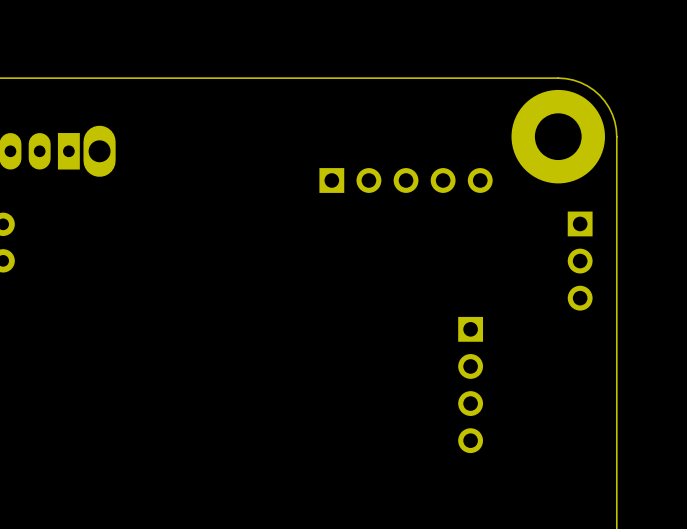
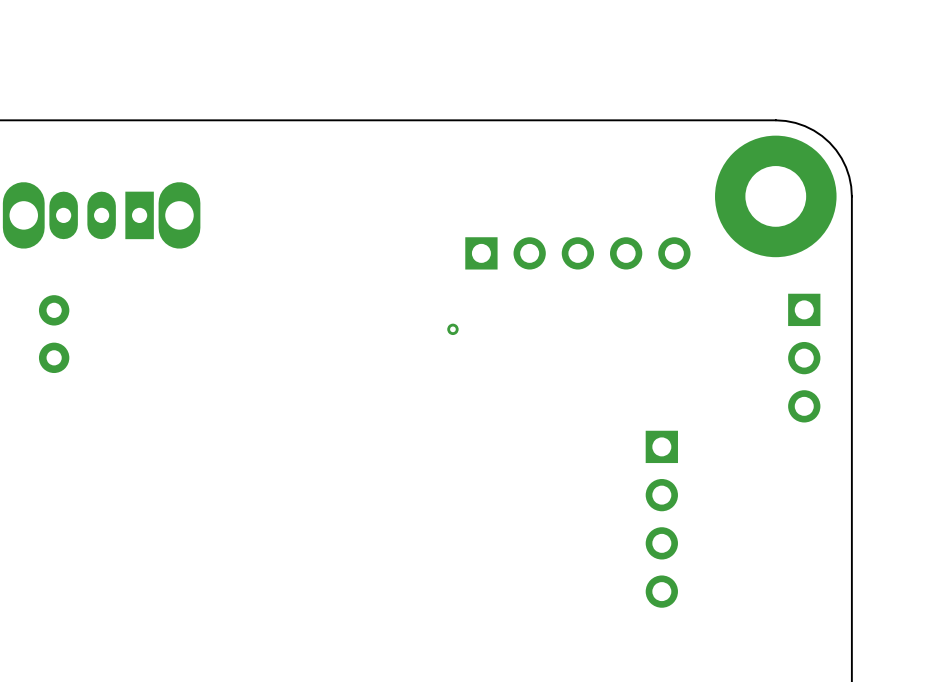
via: none -> (452, 329)

